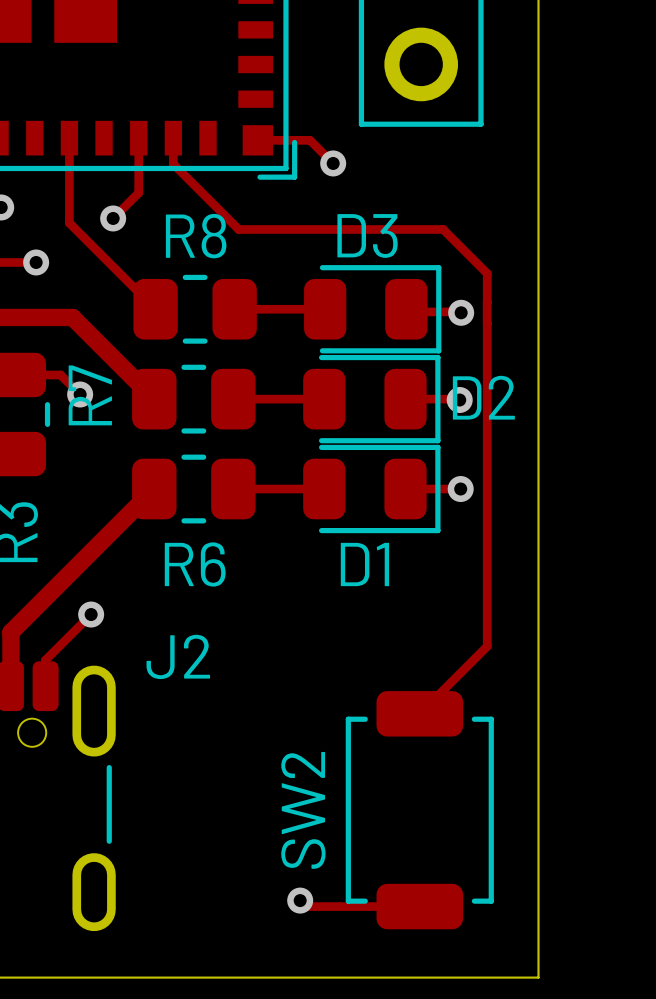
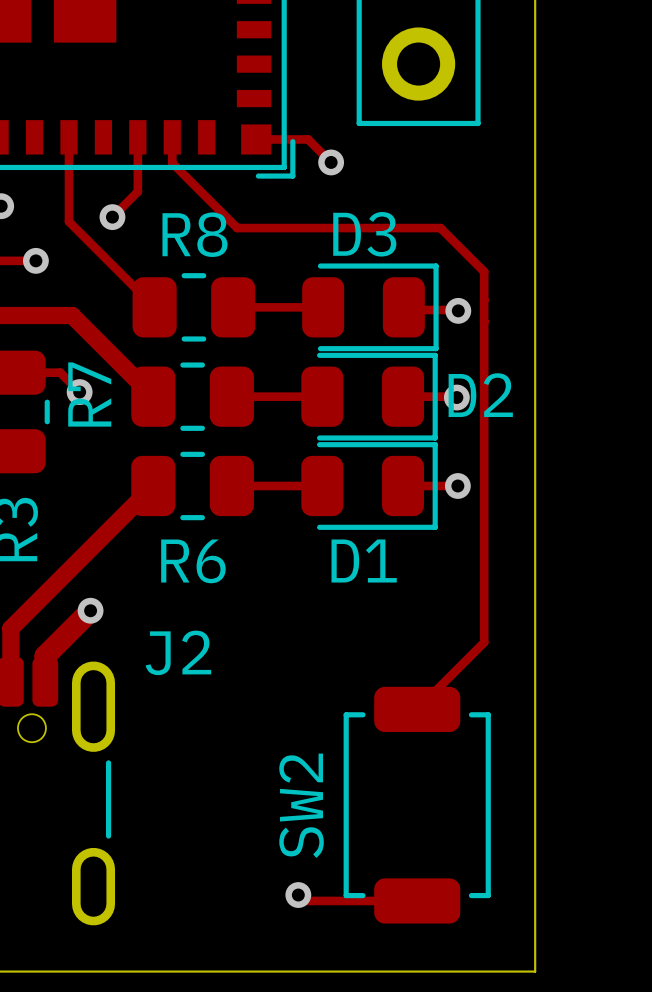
track width: thin (91, 614) (45, 660) (45, 686) -> thick (90, 610) (45, 656) (45, 681)

